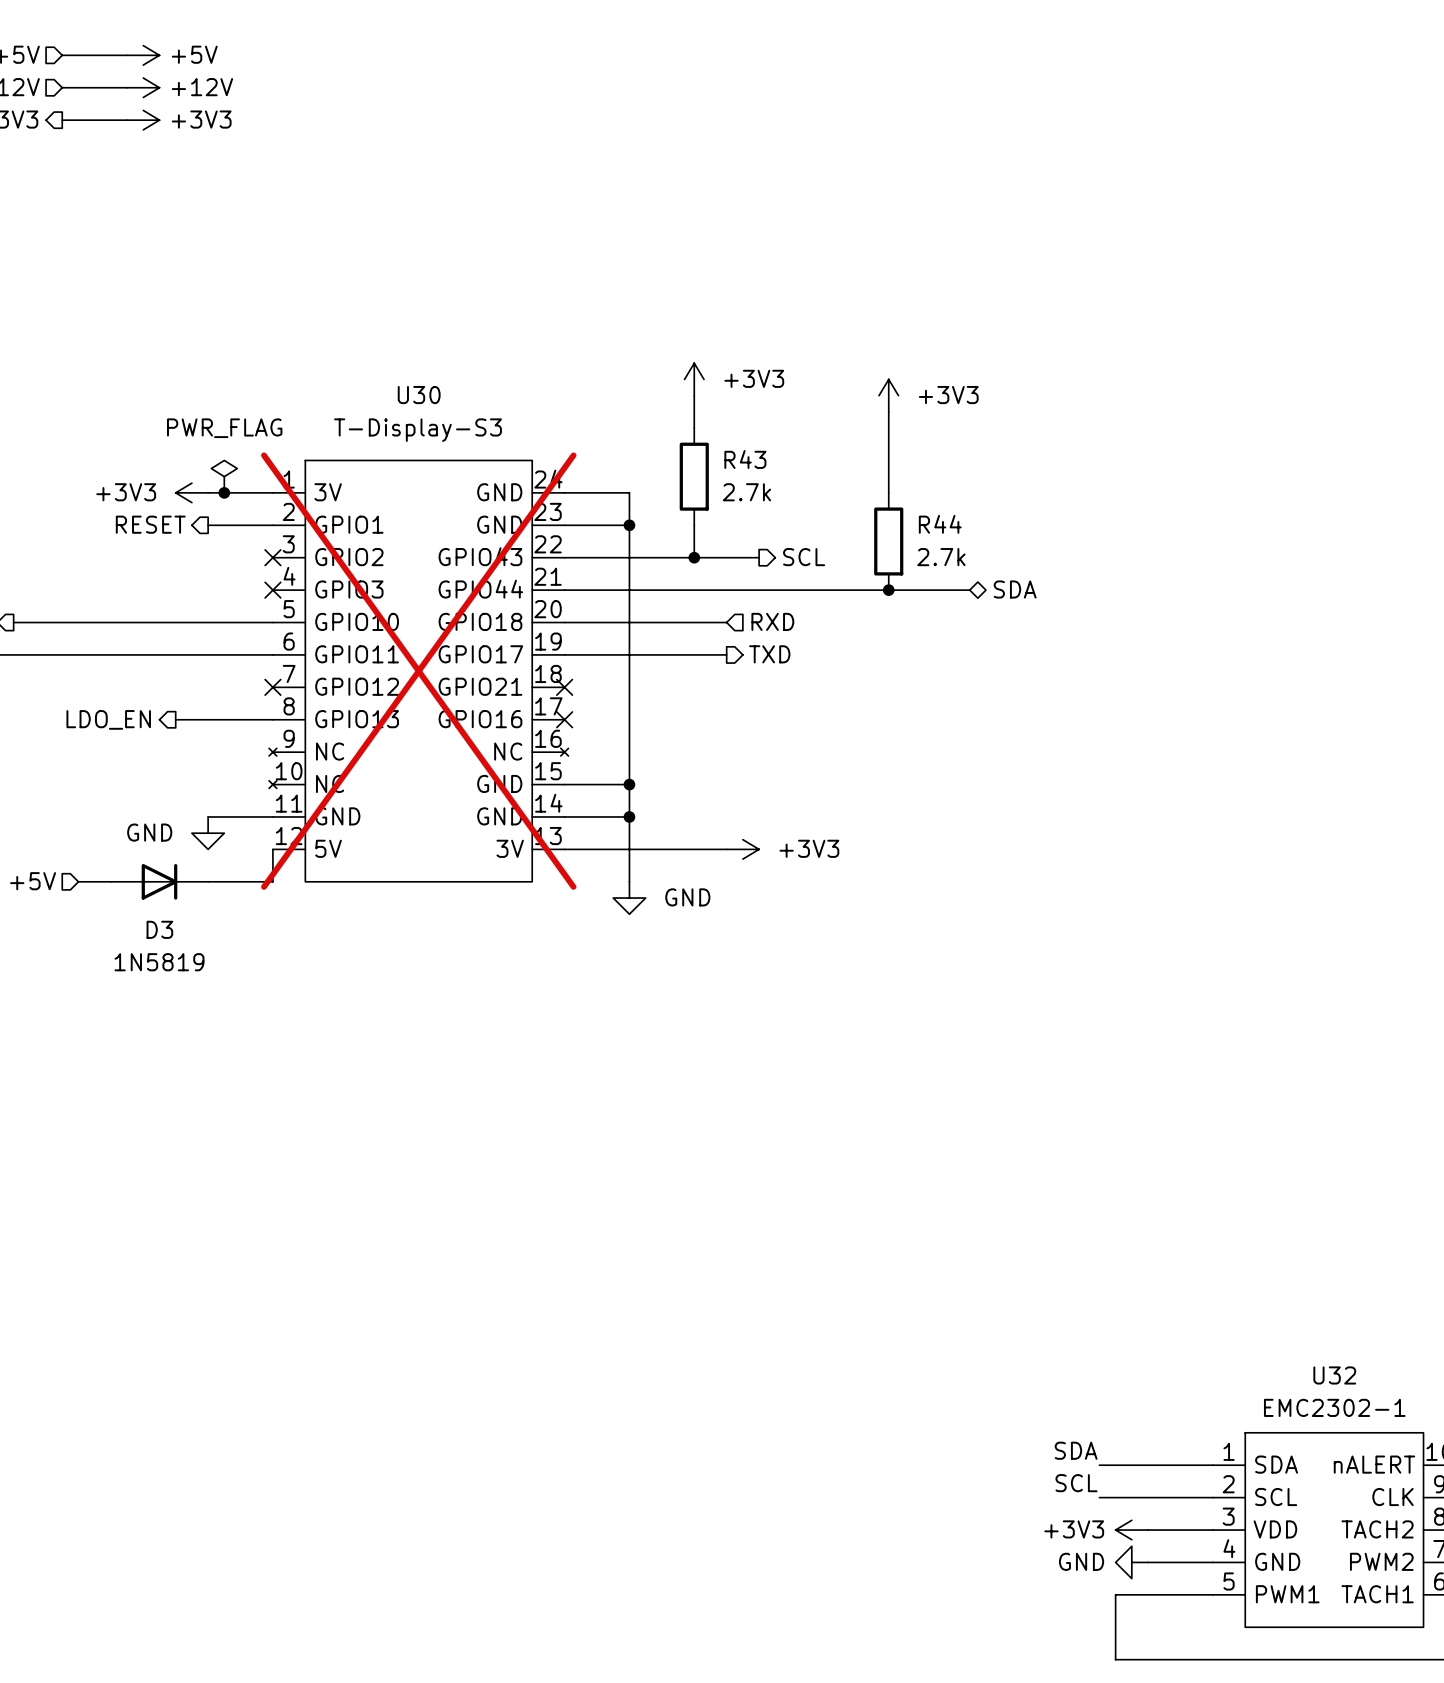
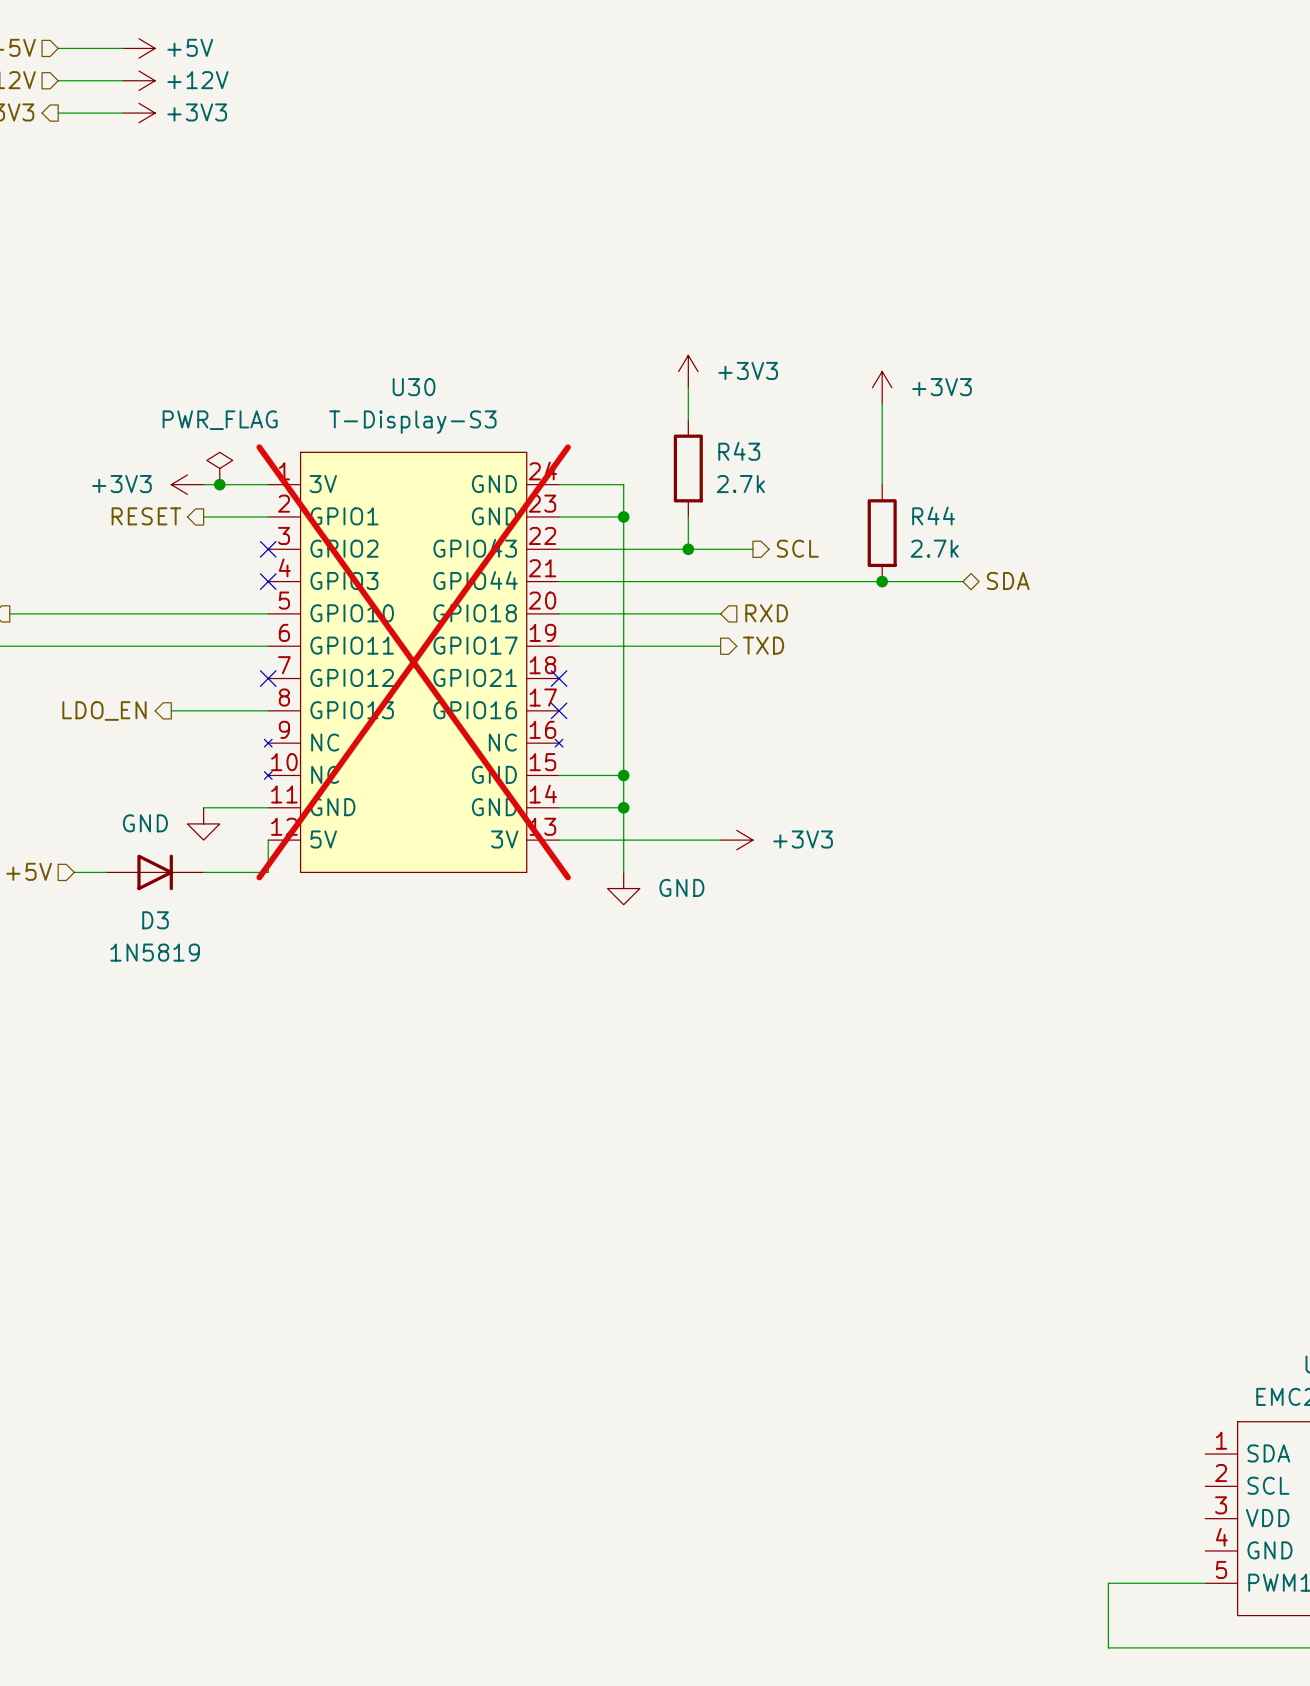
label: SDA (1076, 1450) -> none
wire: (1099, 1465) (1212, 1465) -> none
label: SCL (1076, 1483) -> none
wire: (1099, 1497) (1212, 1497) -> none
power symbol: +3V3 (1131, 1530) -> none
wire: (1148, 1530) (1212, 1530) -> none
power symbol: GND (1131, 1562) -> none
wire: (1148, 1562) (1212, 1562) -> none

